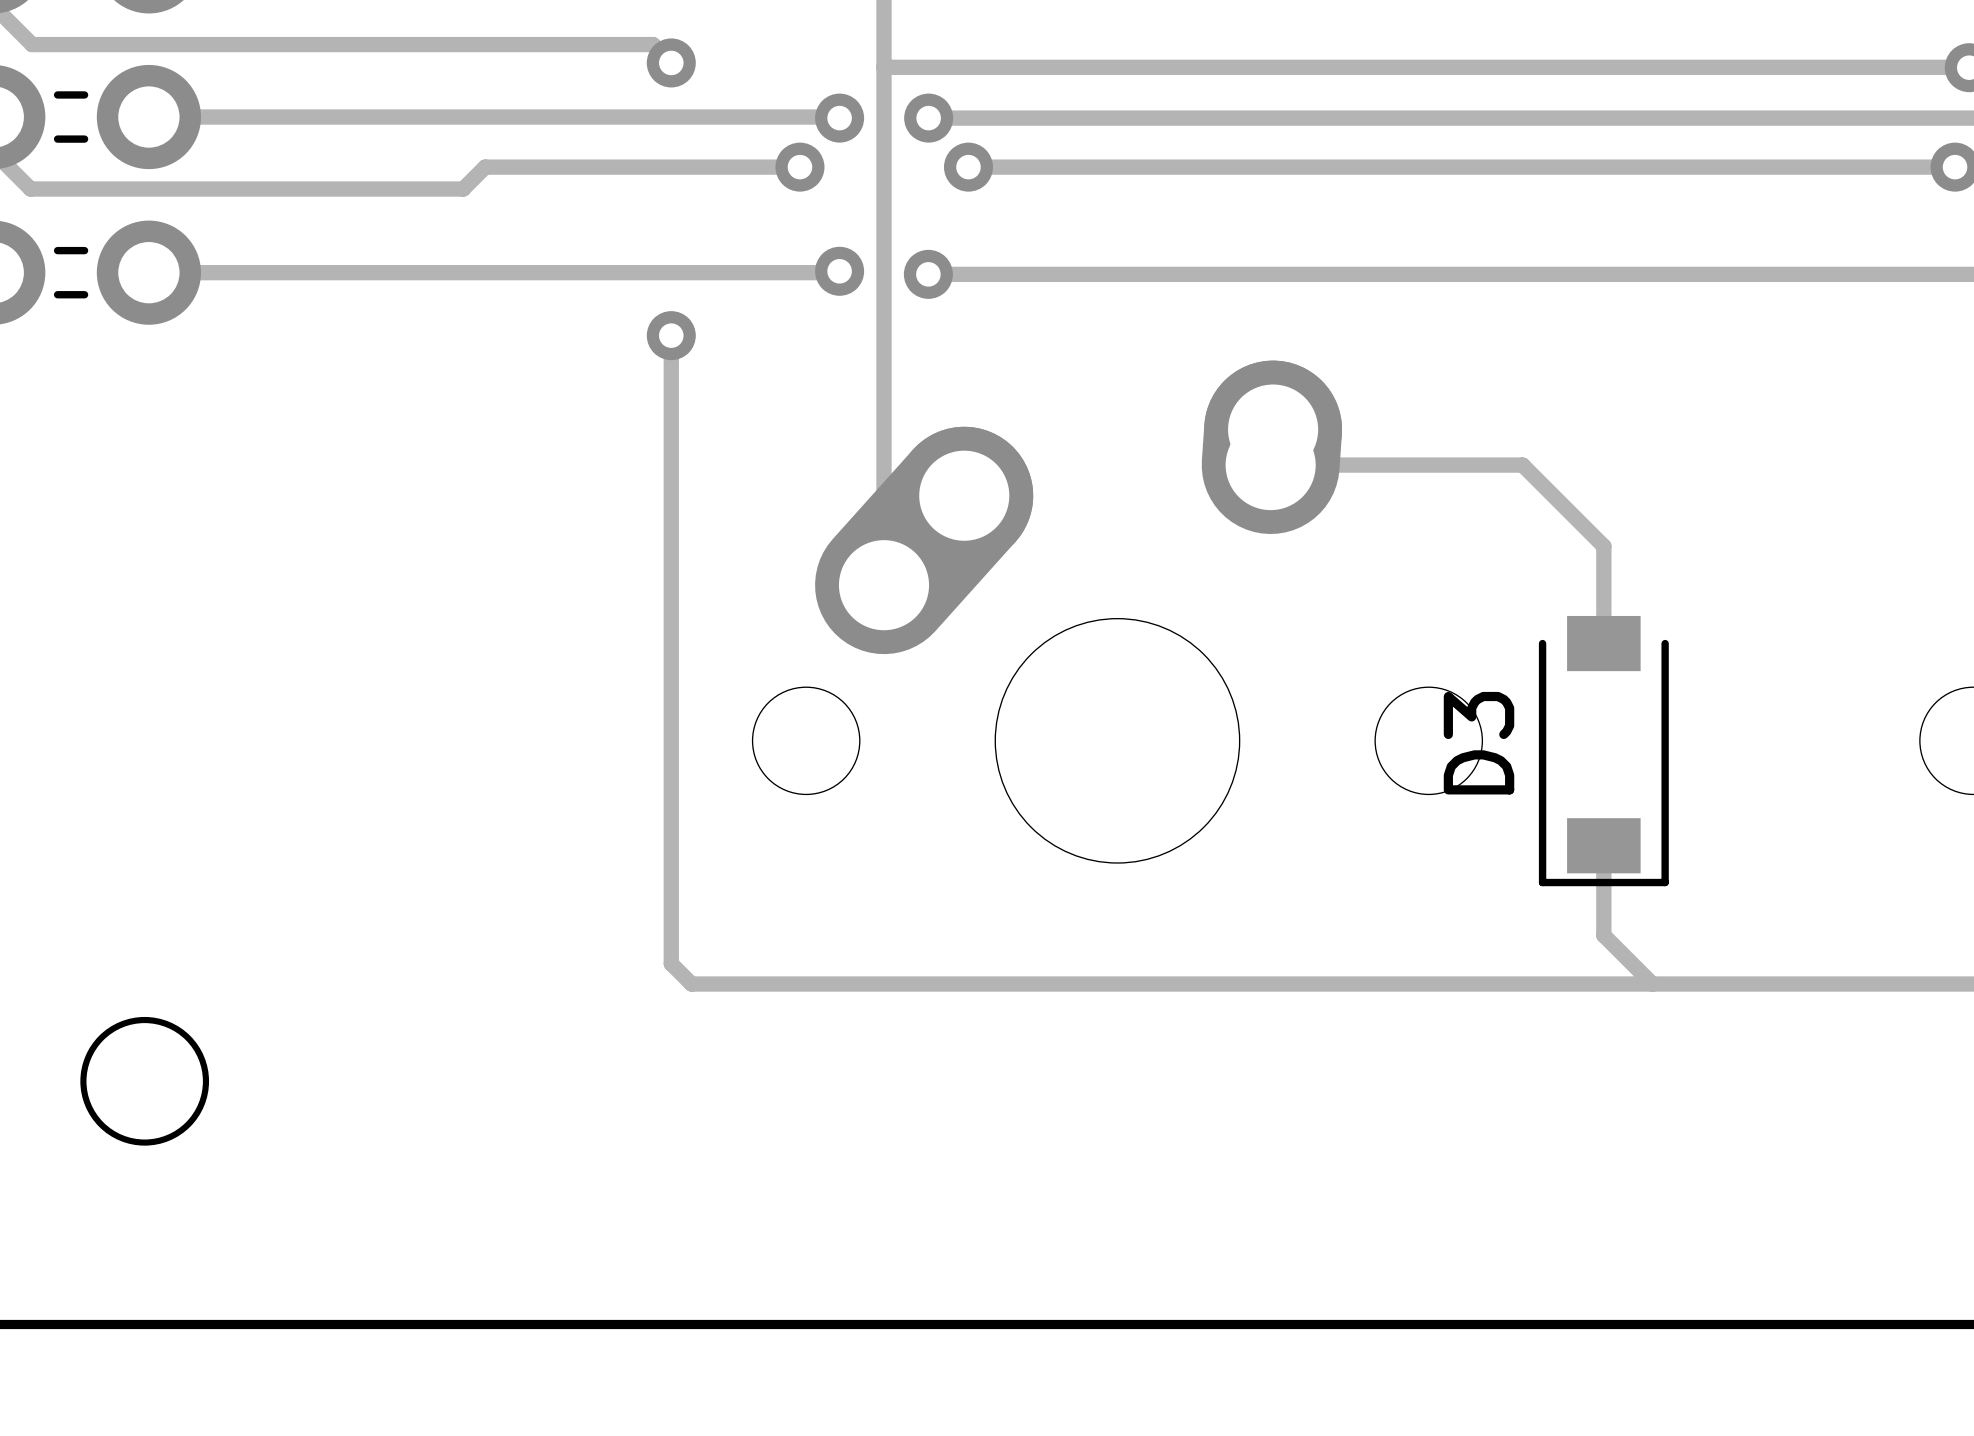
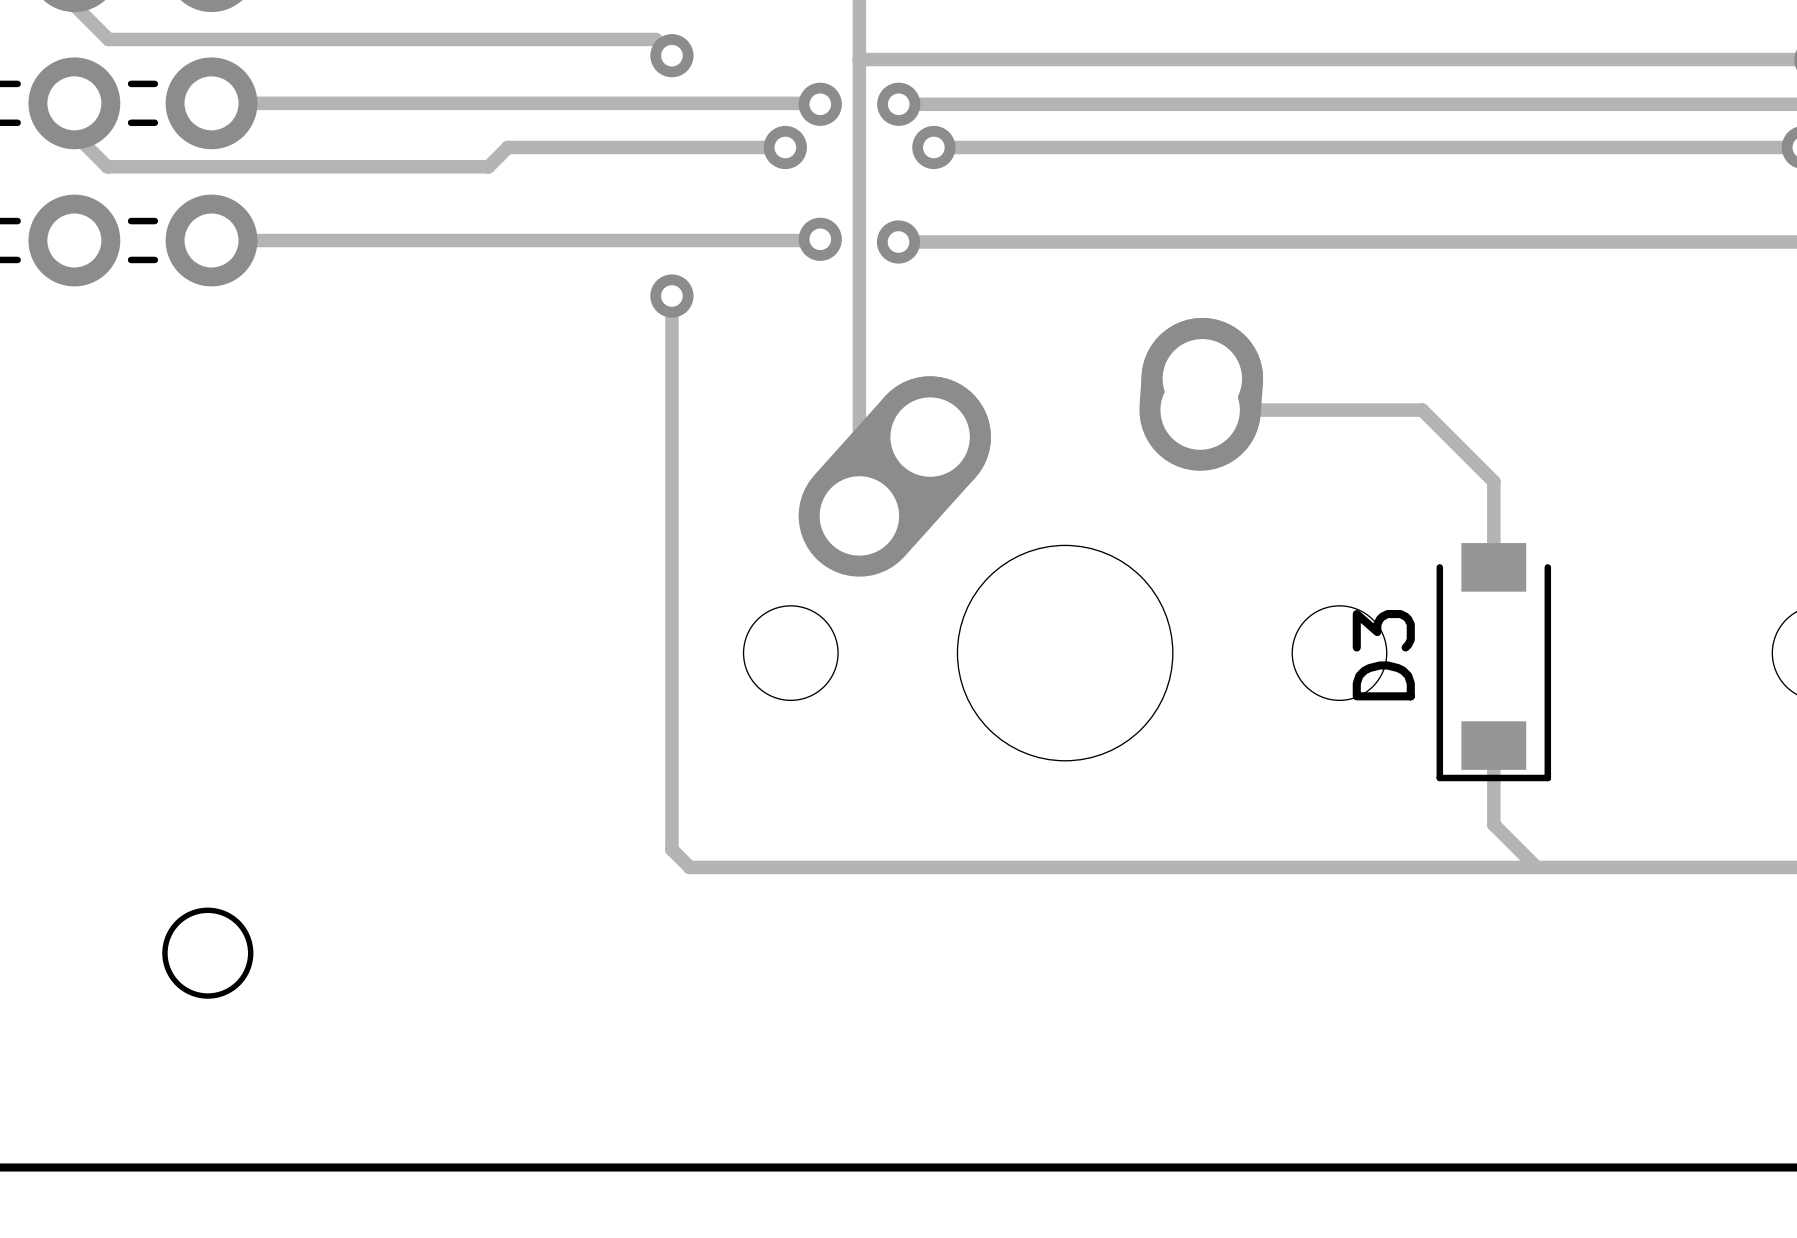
round board edge size: [80, 1016, 210, 1146] -> [162, 907, 254, 999]

